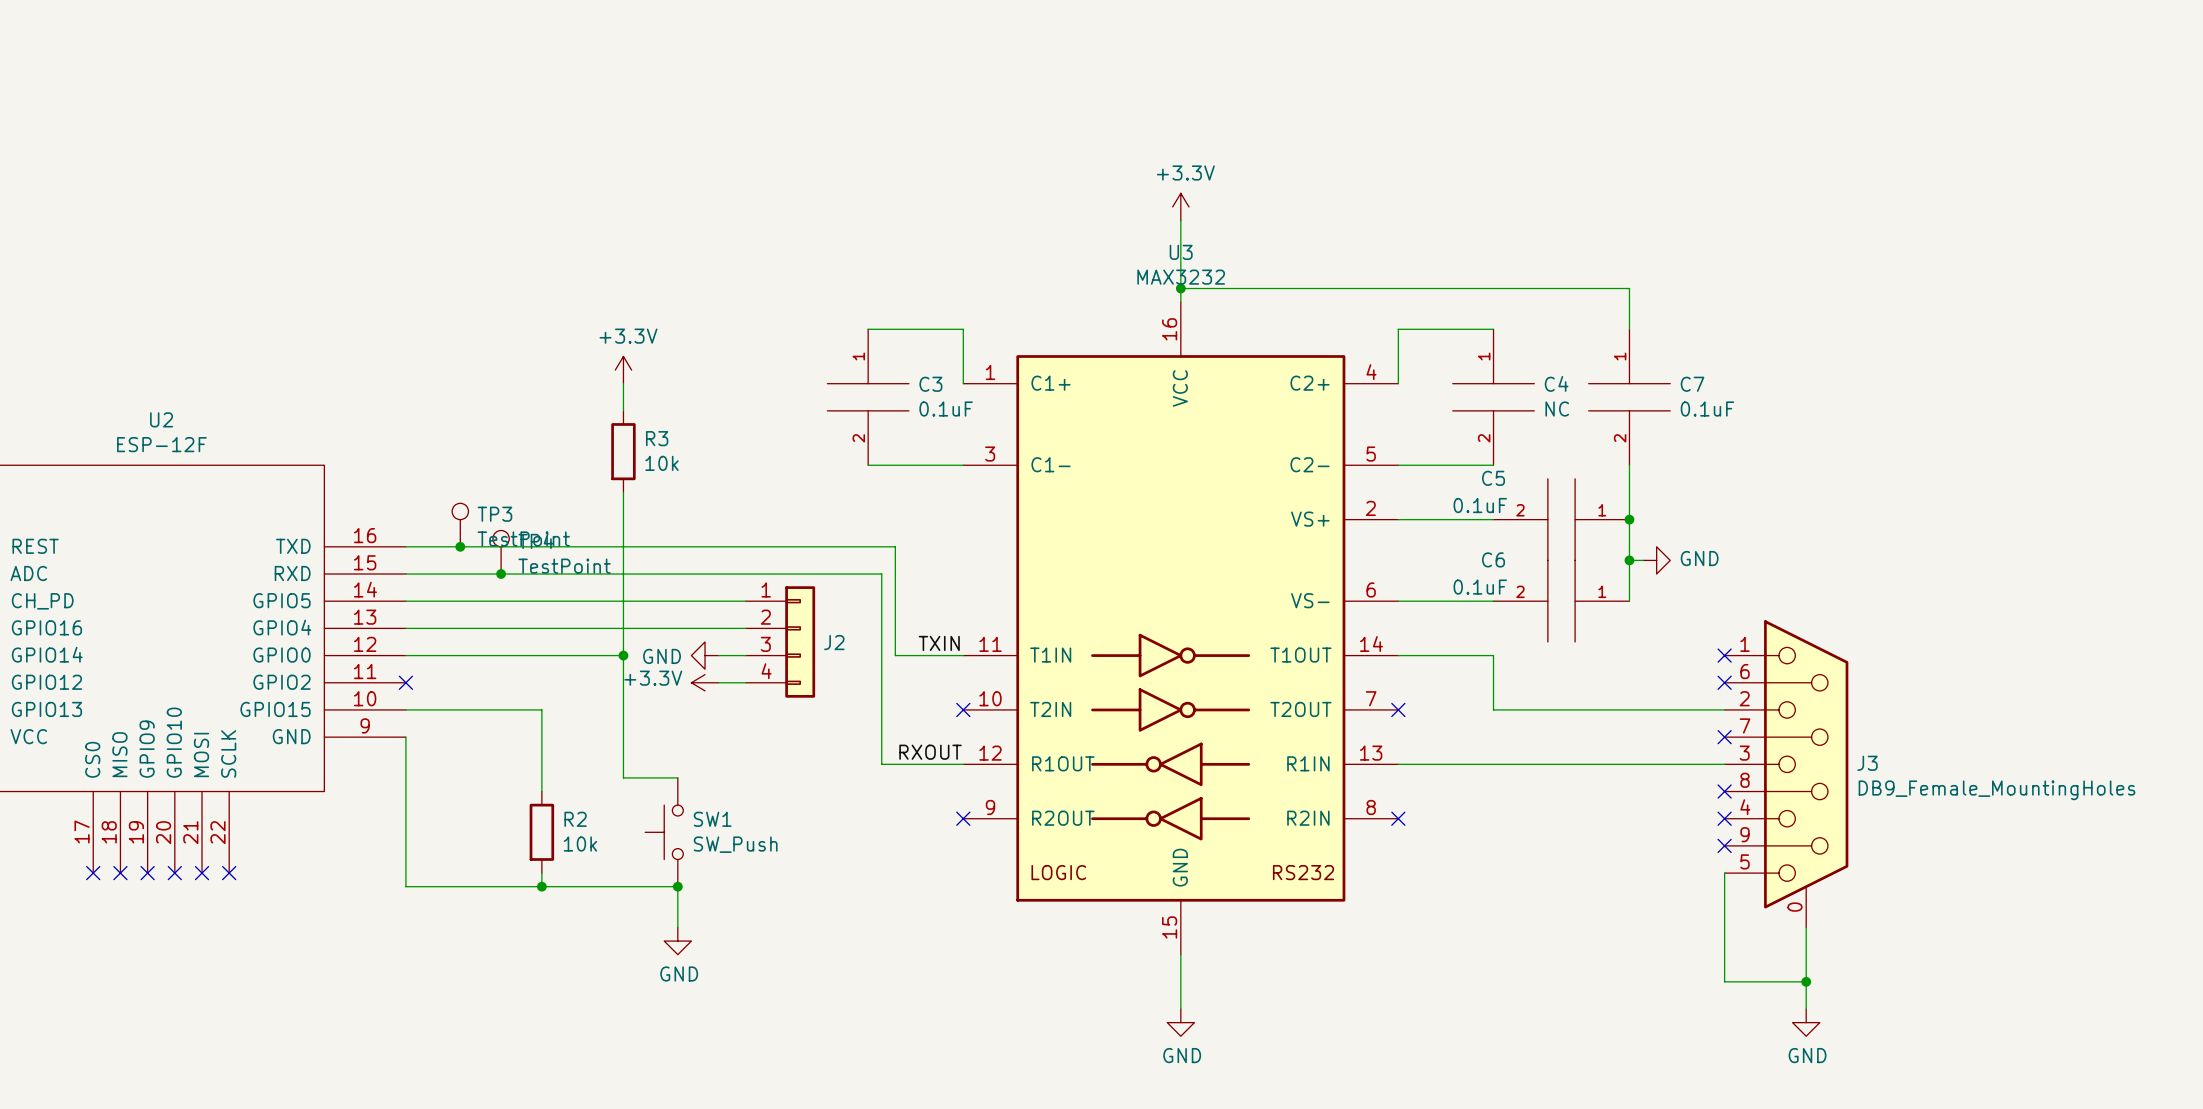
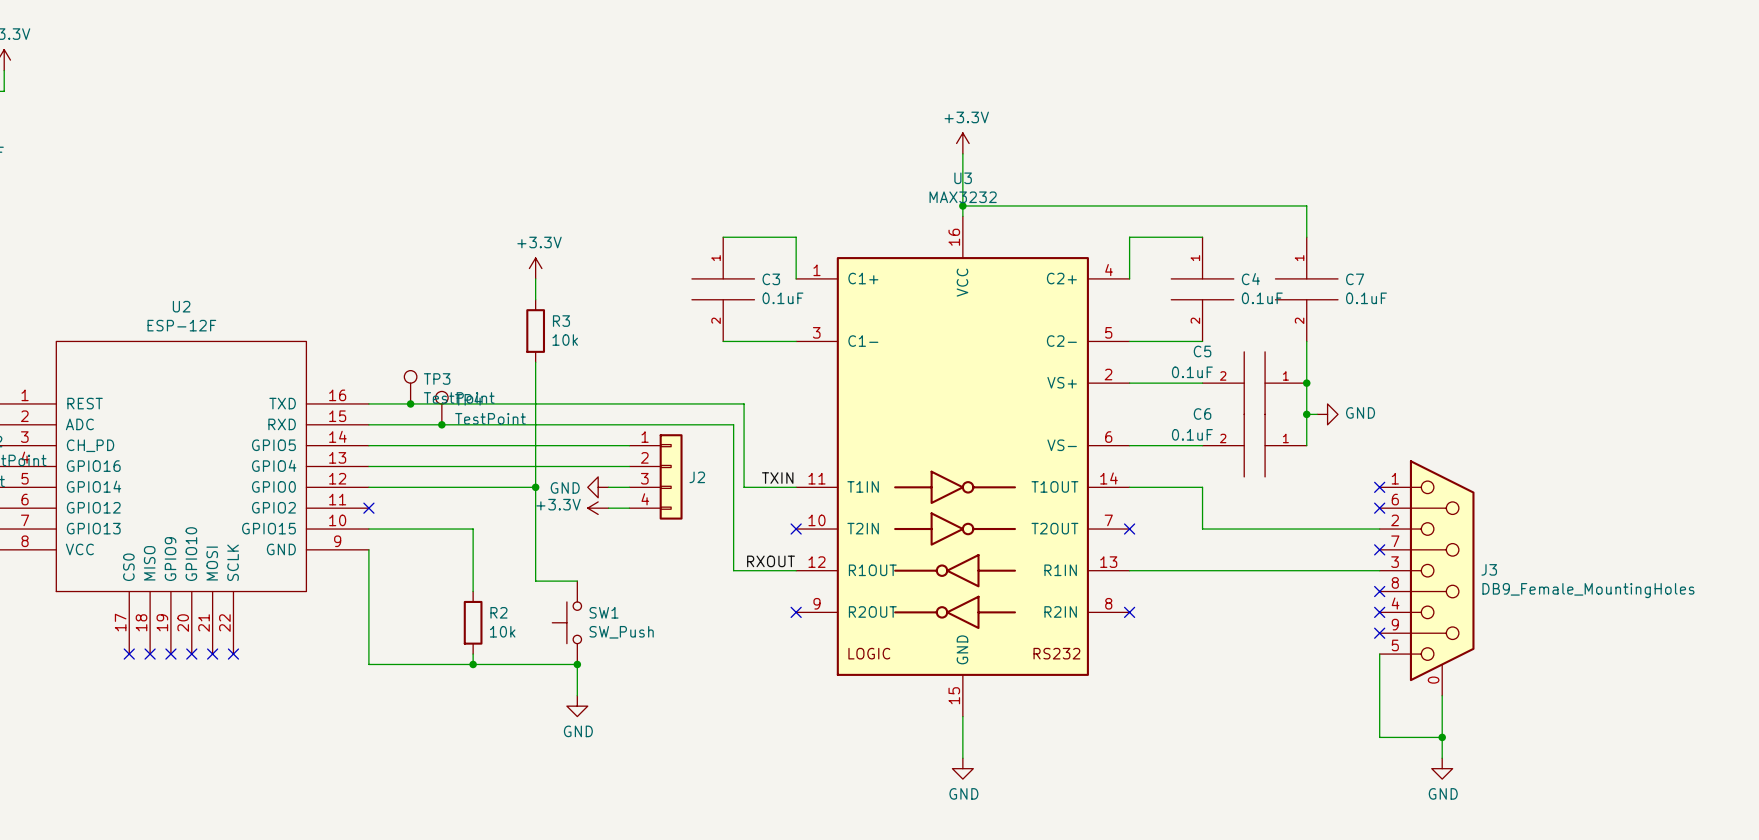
C4 value: NC (1557, 409) -> 0.1uF (1262, 298)

